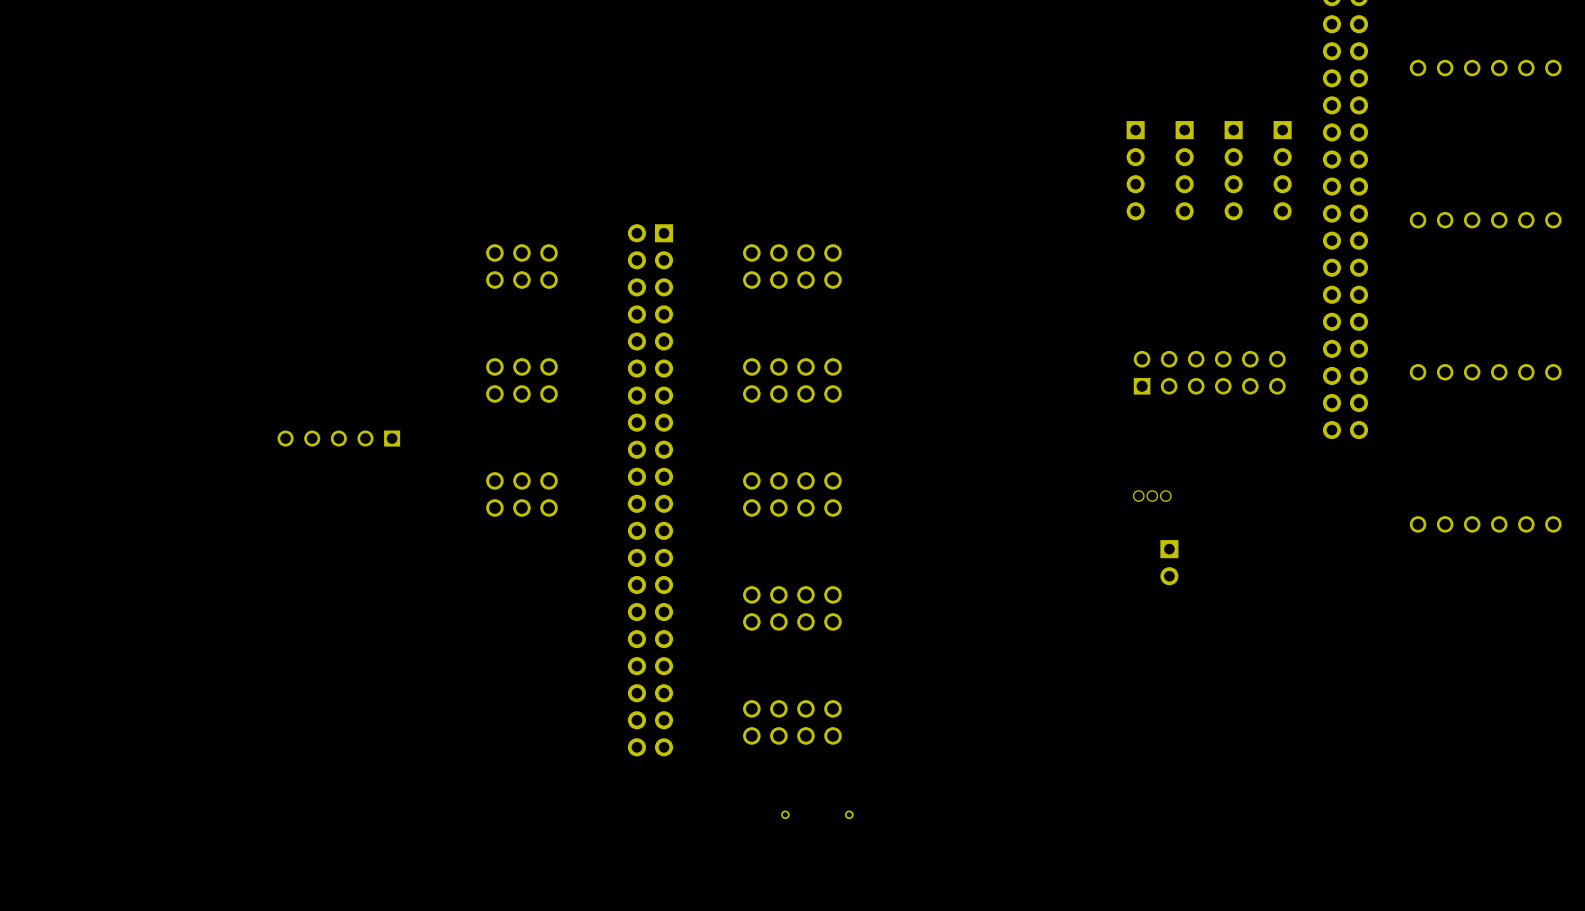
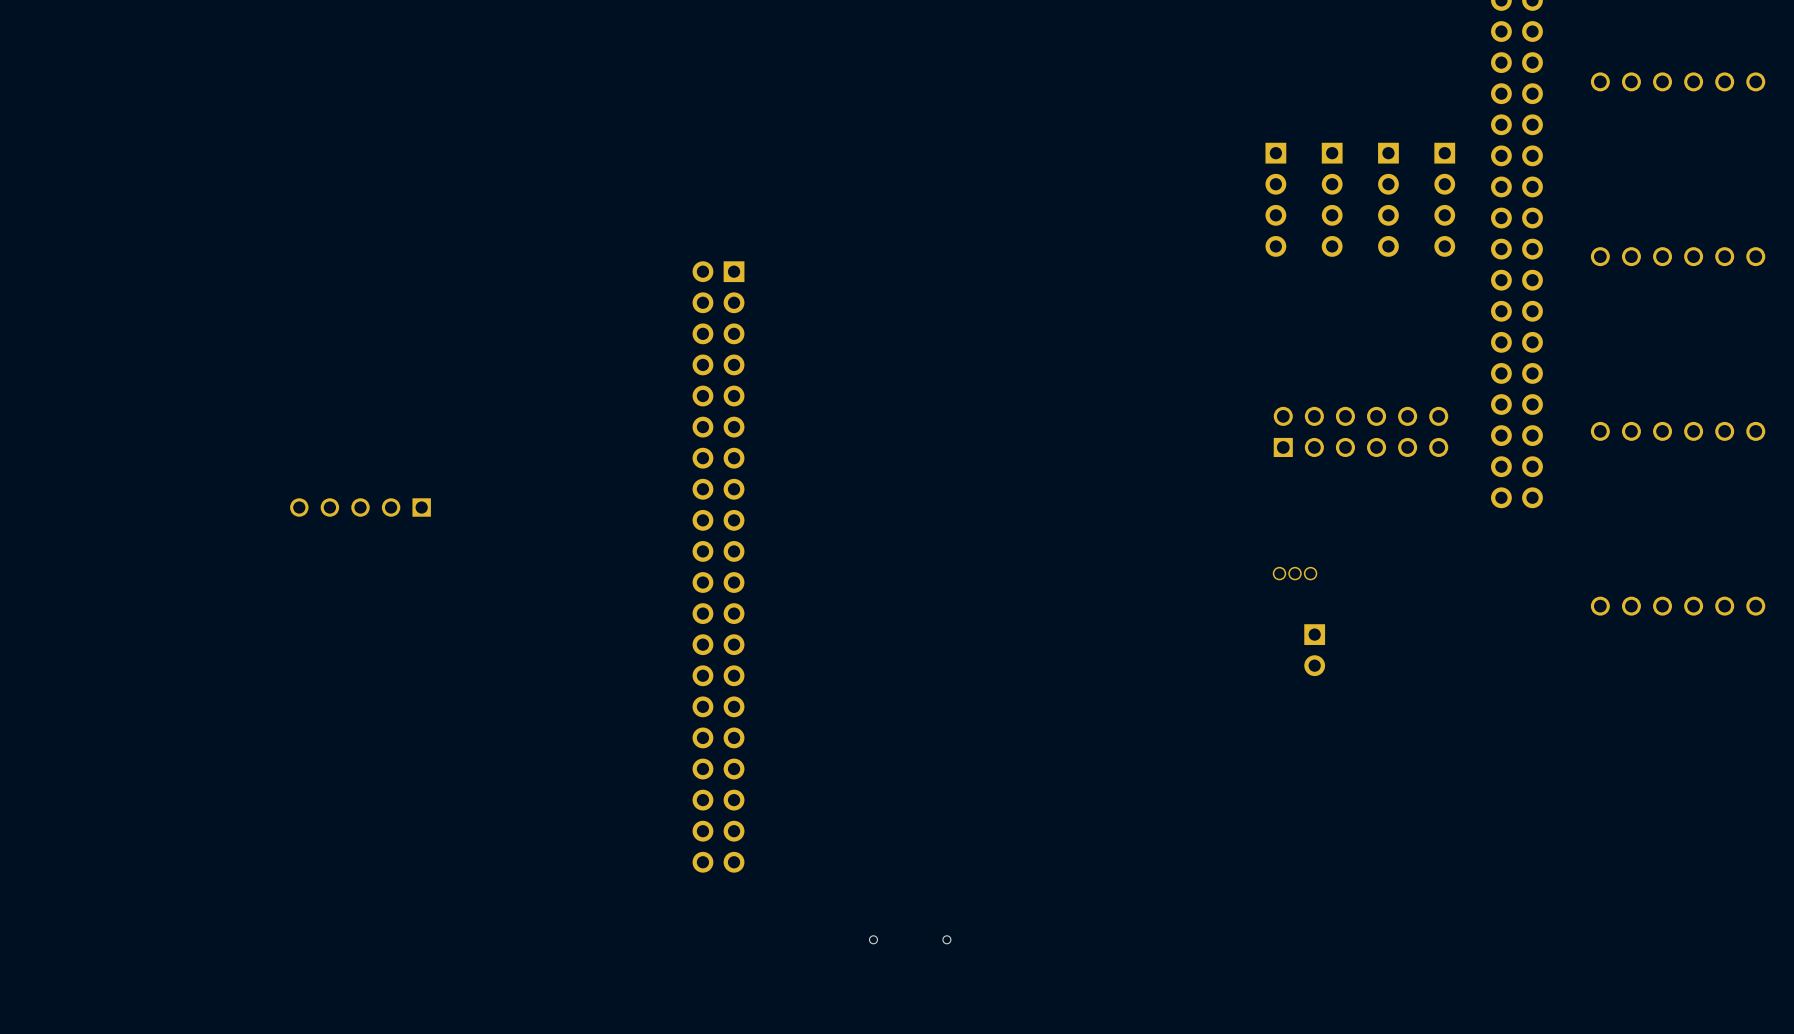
part: (521, 266) -> none
part: (792, 266) -> none
part: (521, 380) -> none
part: (792, 380) -> none
part: (521, 494) -> none
part: (792, 494) -> none
part: (792, 608) -> none
part: (792, 722) -> none

